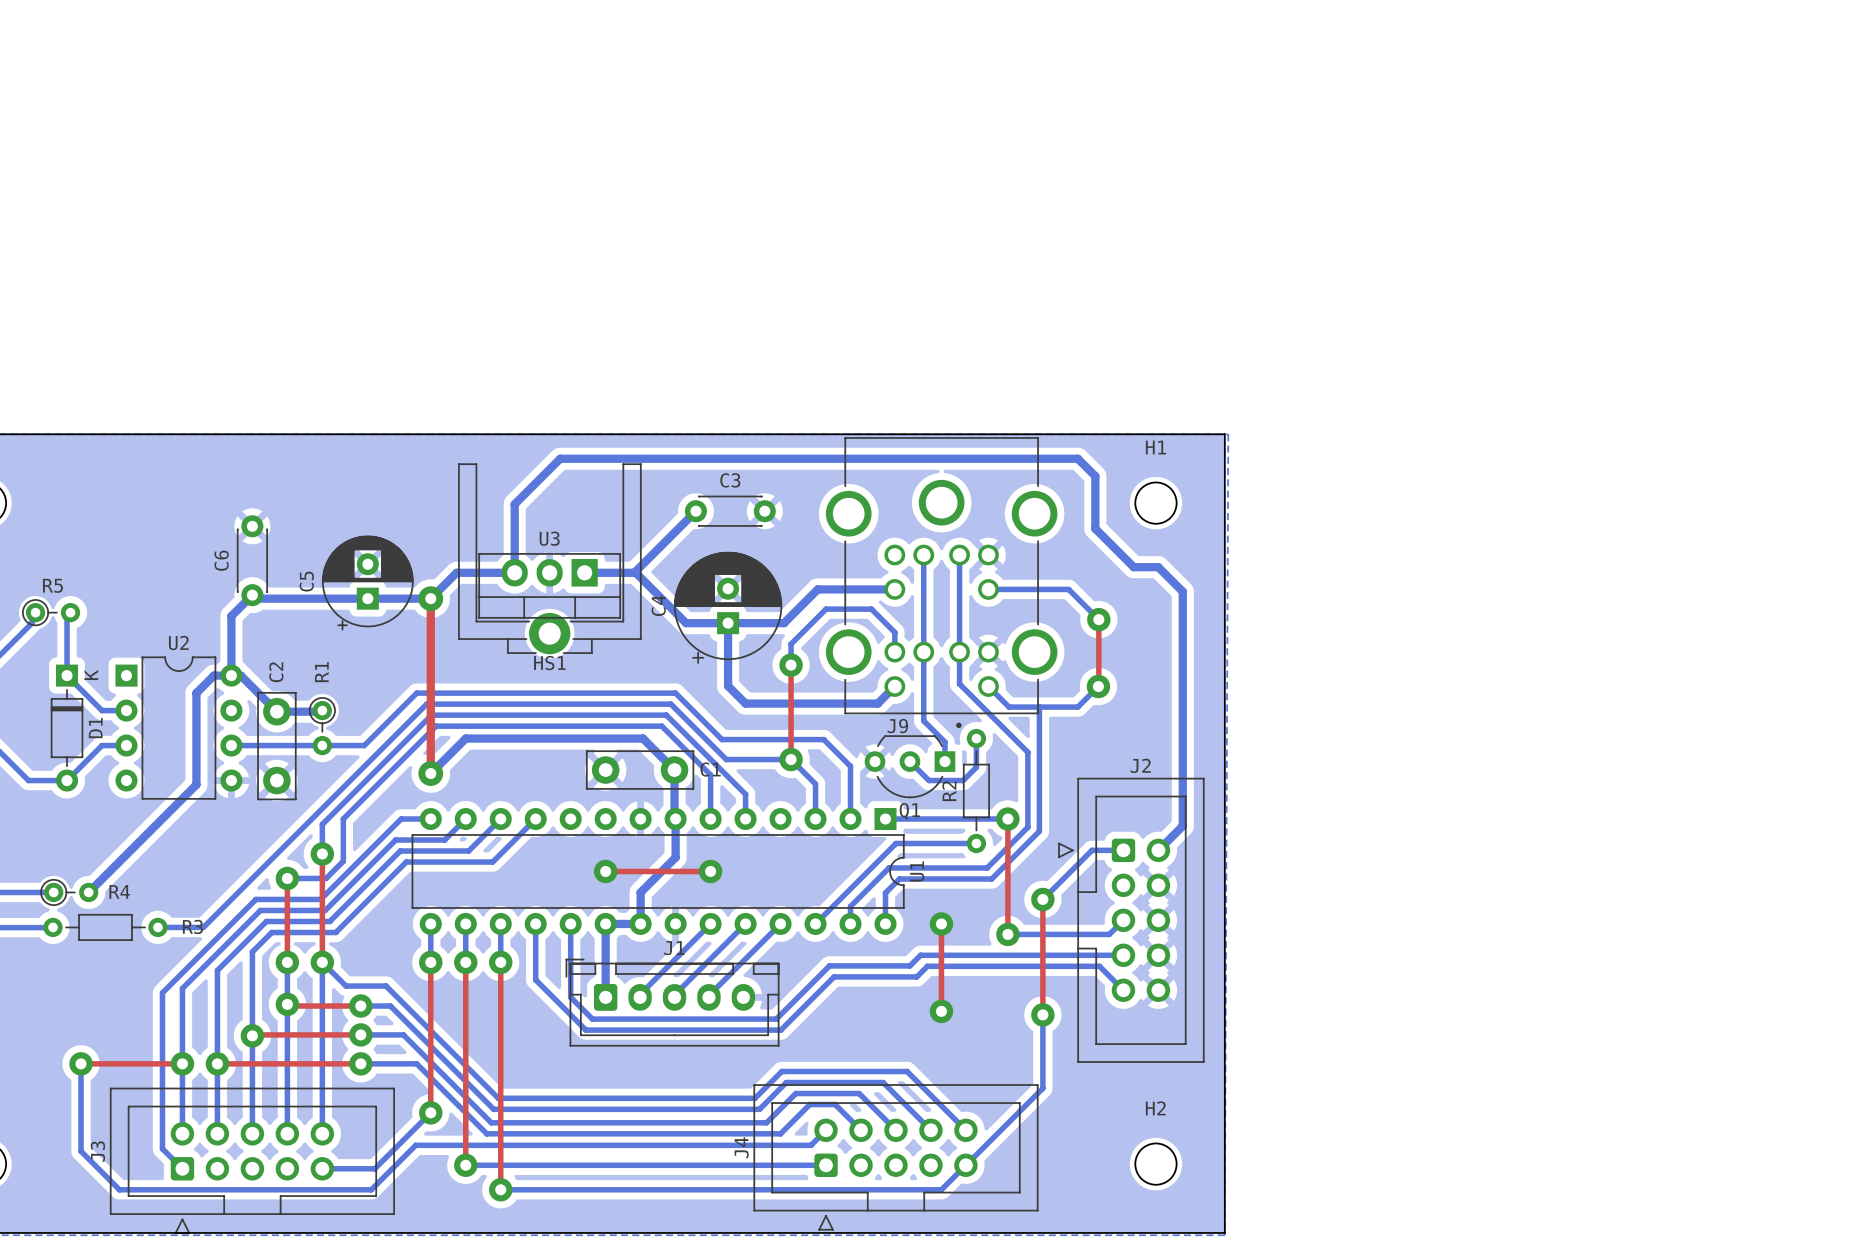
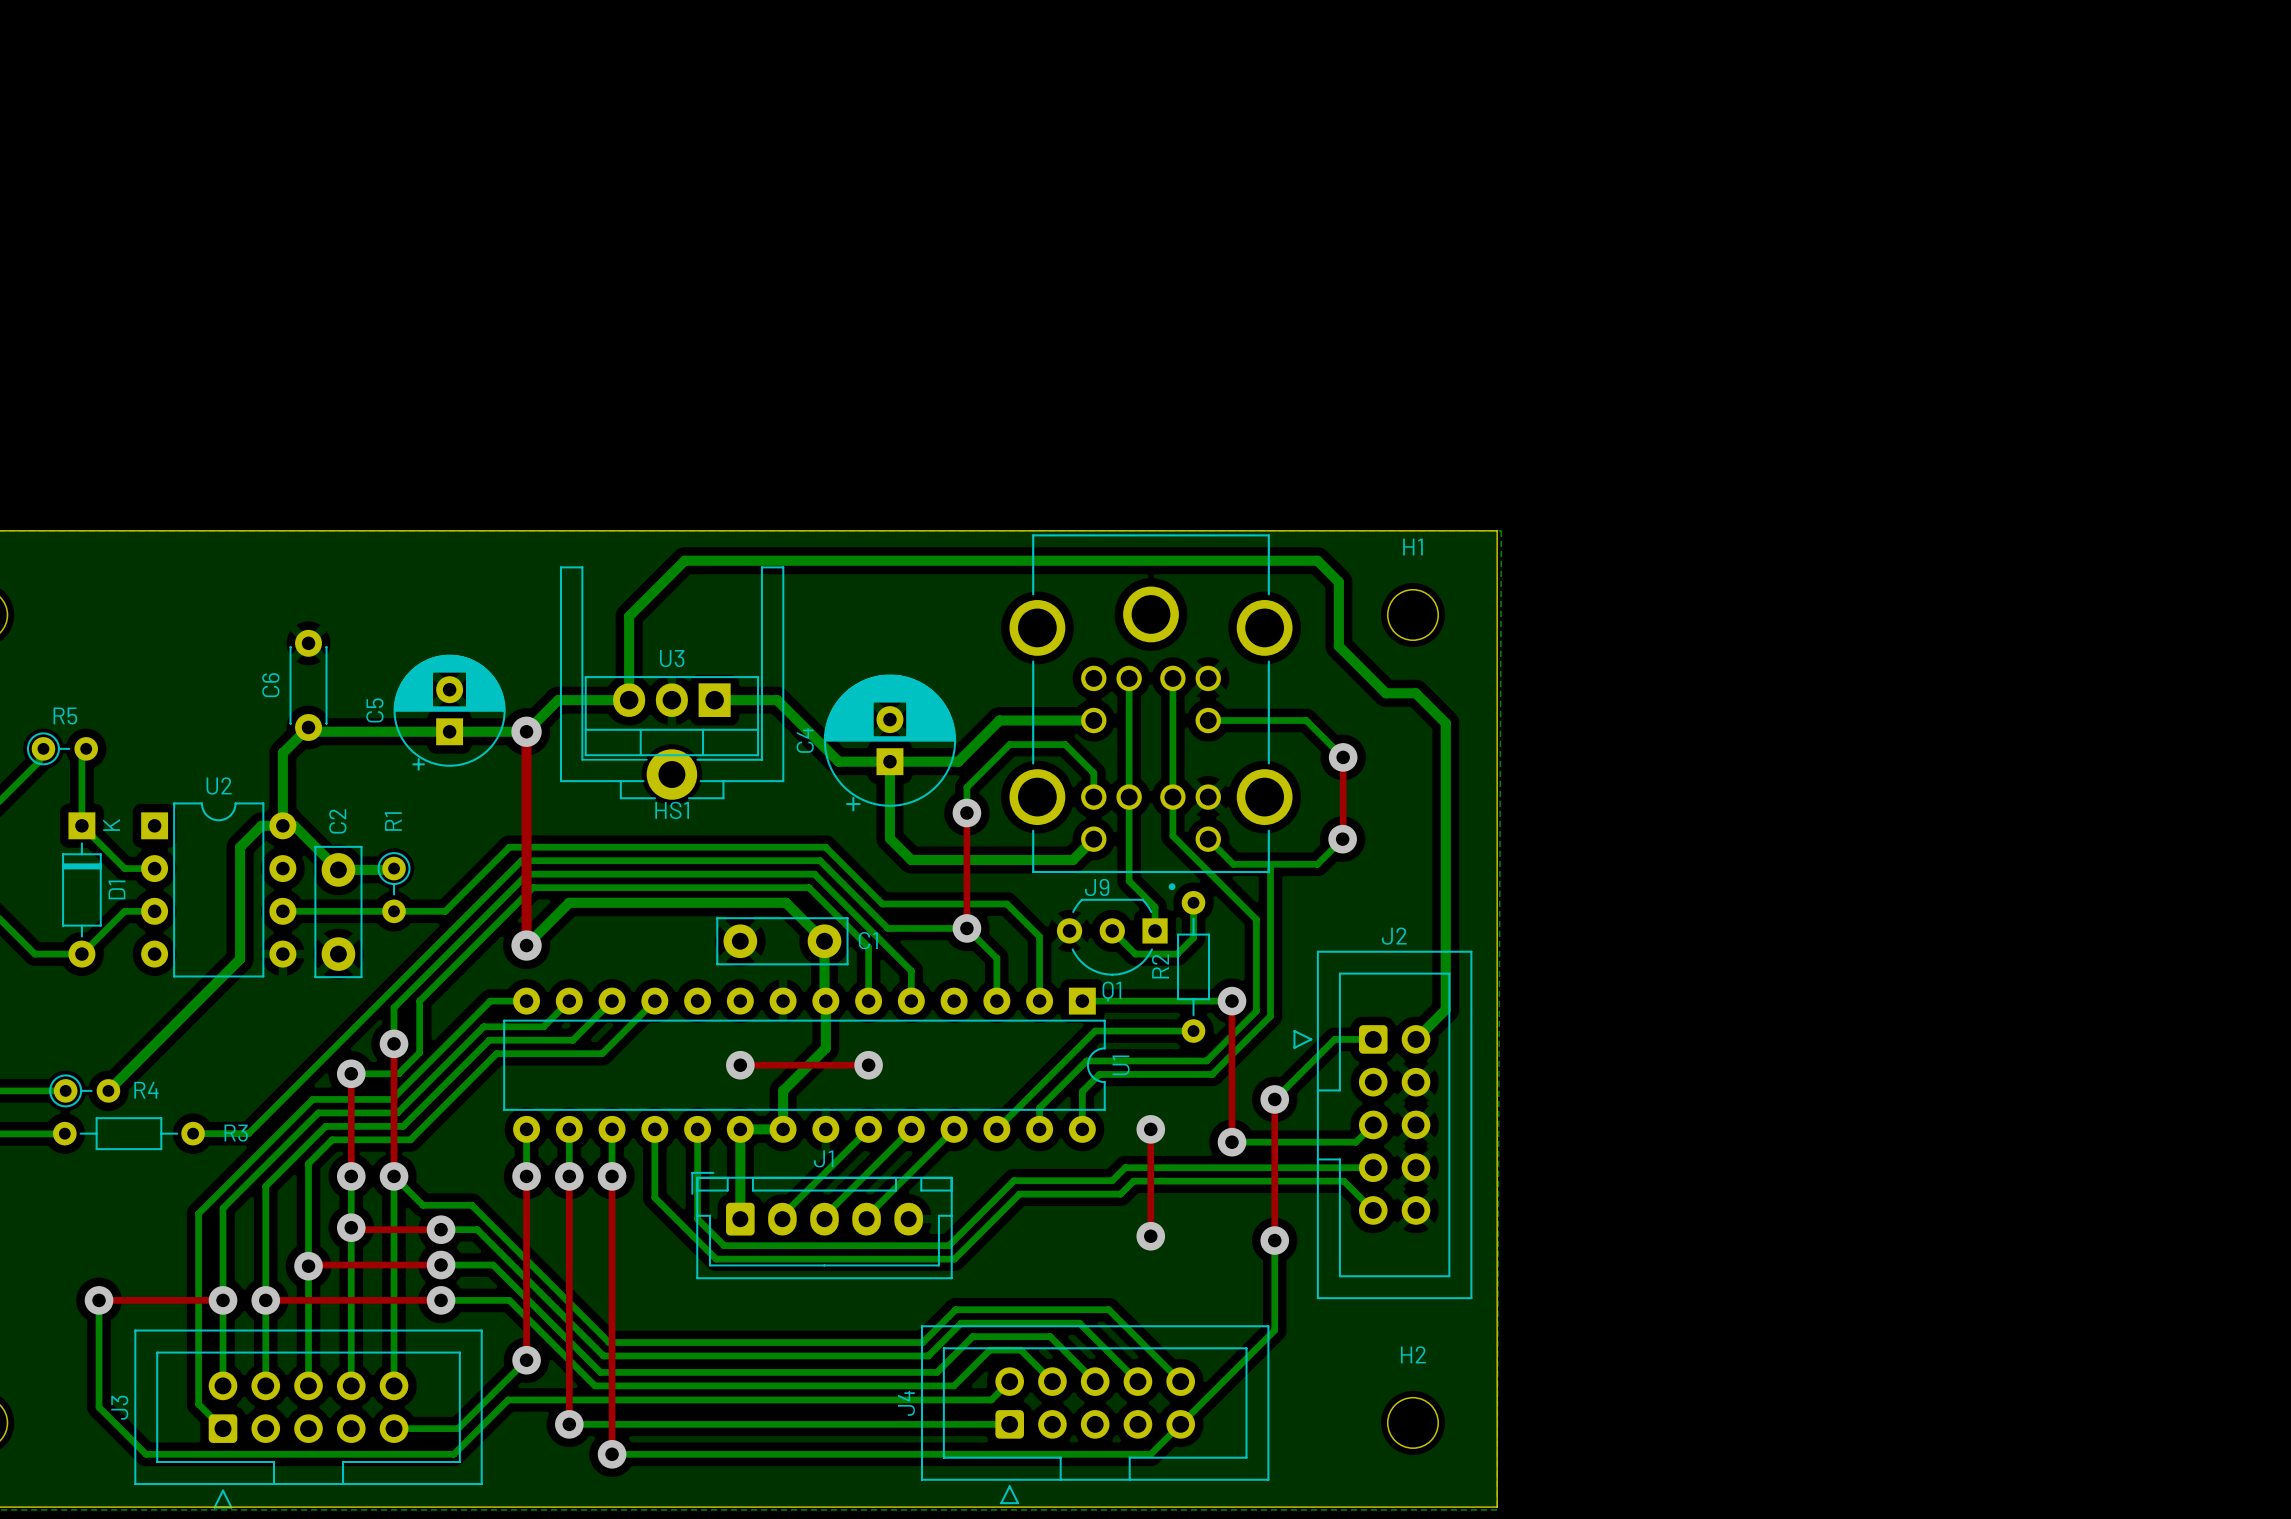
bottom track: (695, 511) (635, 572) -> none
C3: (730, 511) -> none

